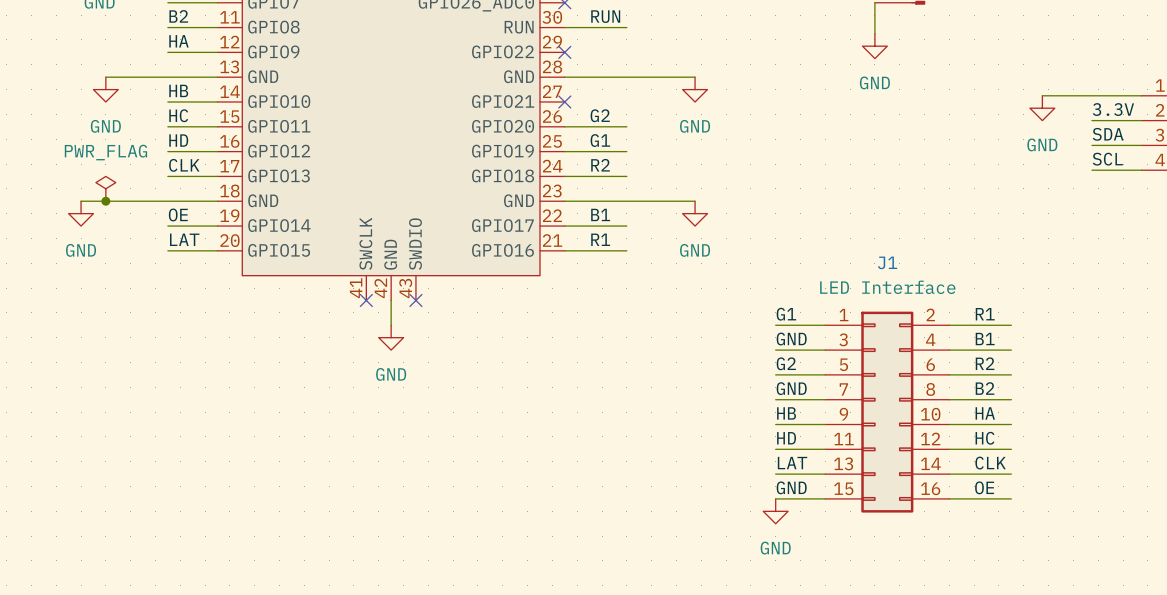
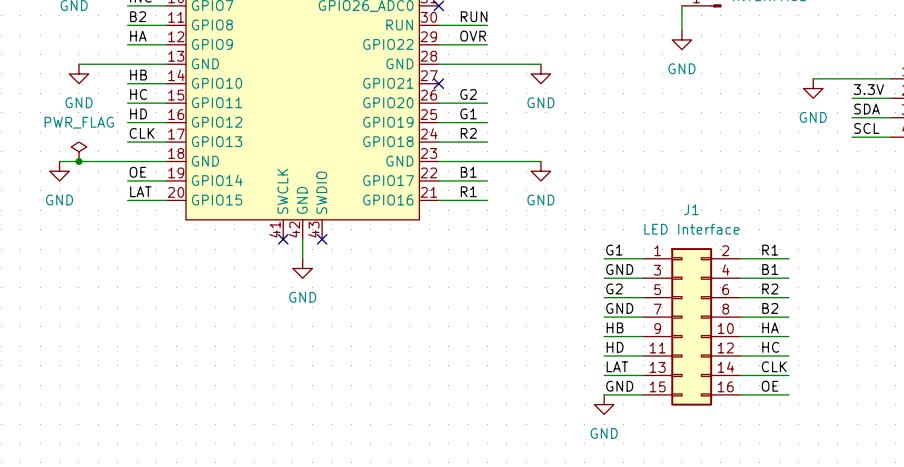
label: none -> OVR (473, 36)
wire: none -> (438, 44) (487, 44)
no-connect mark: (564, 52) -> none

